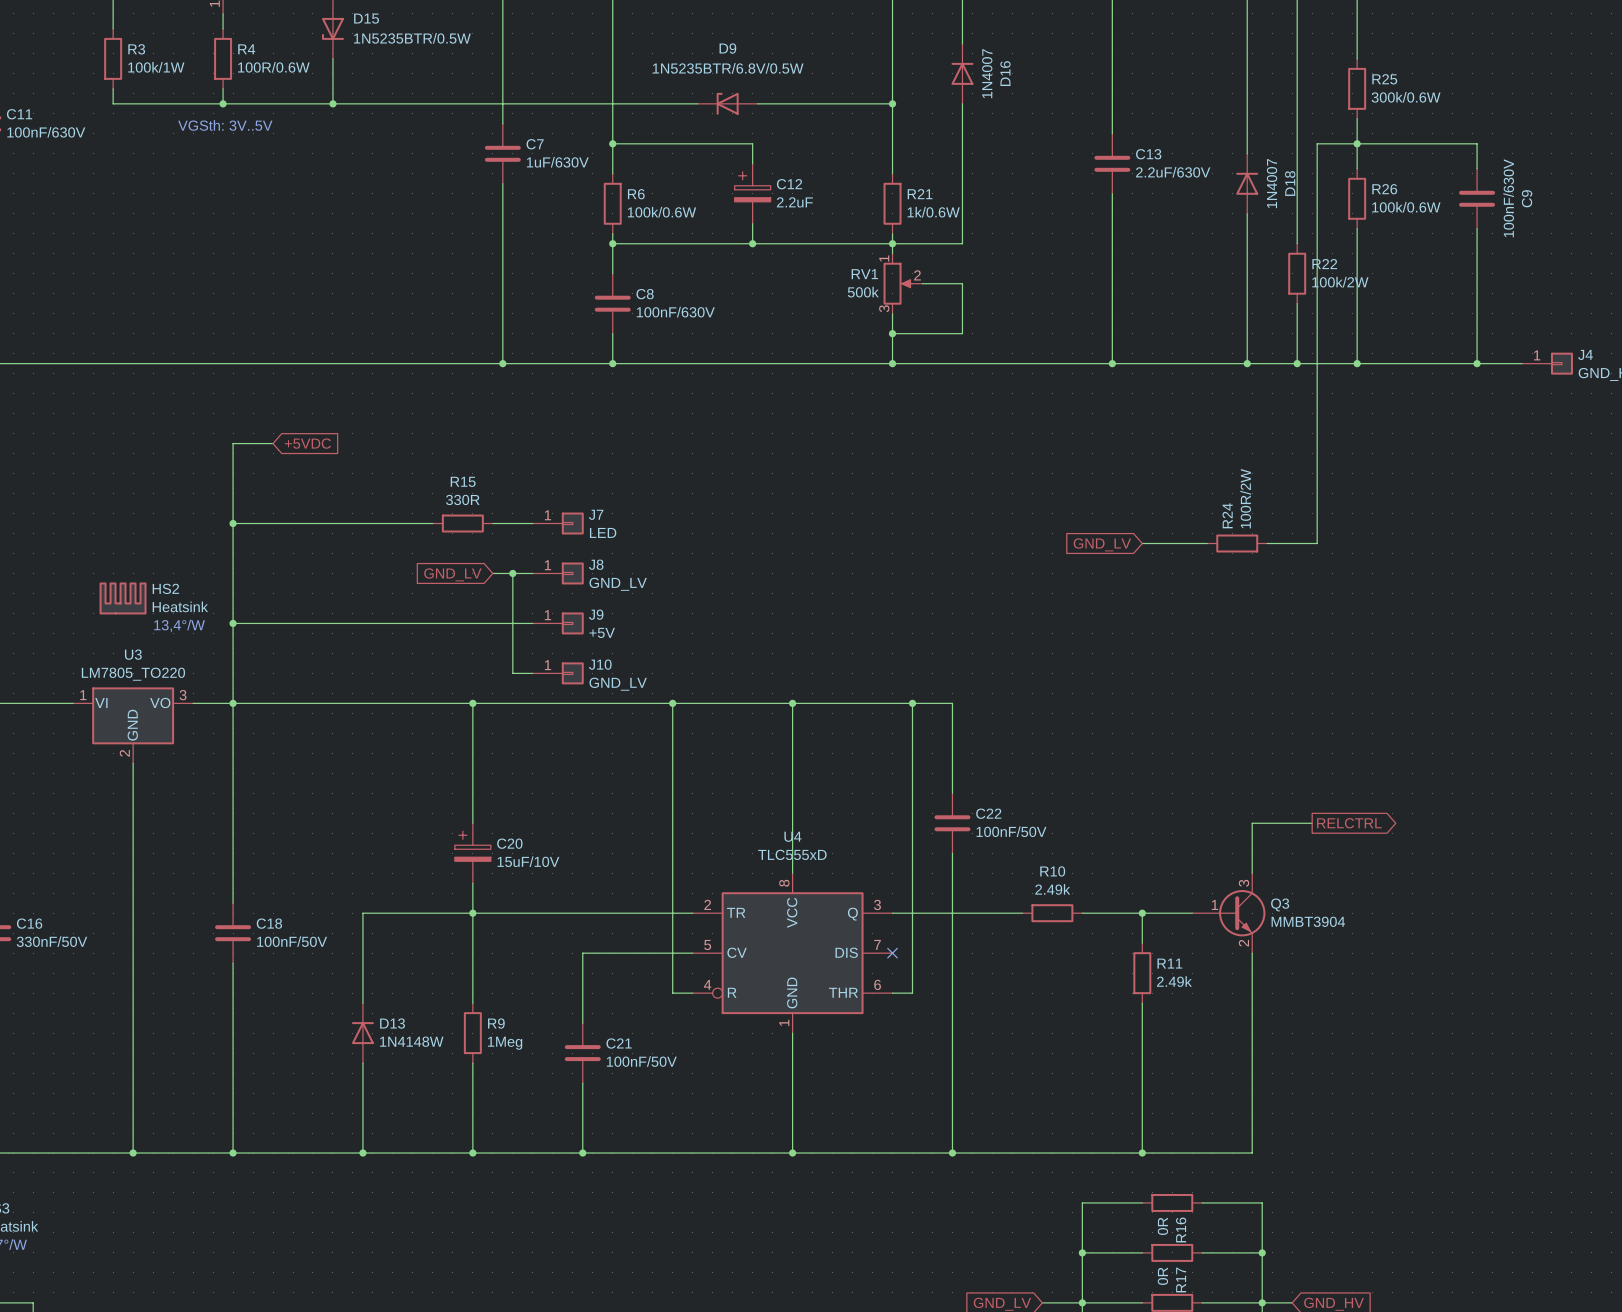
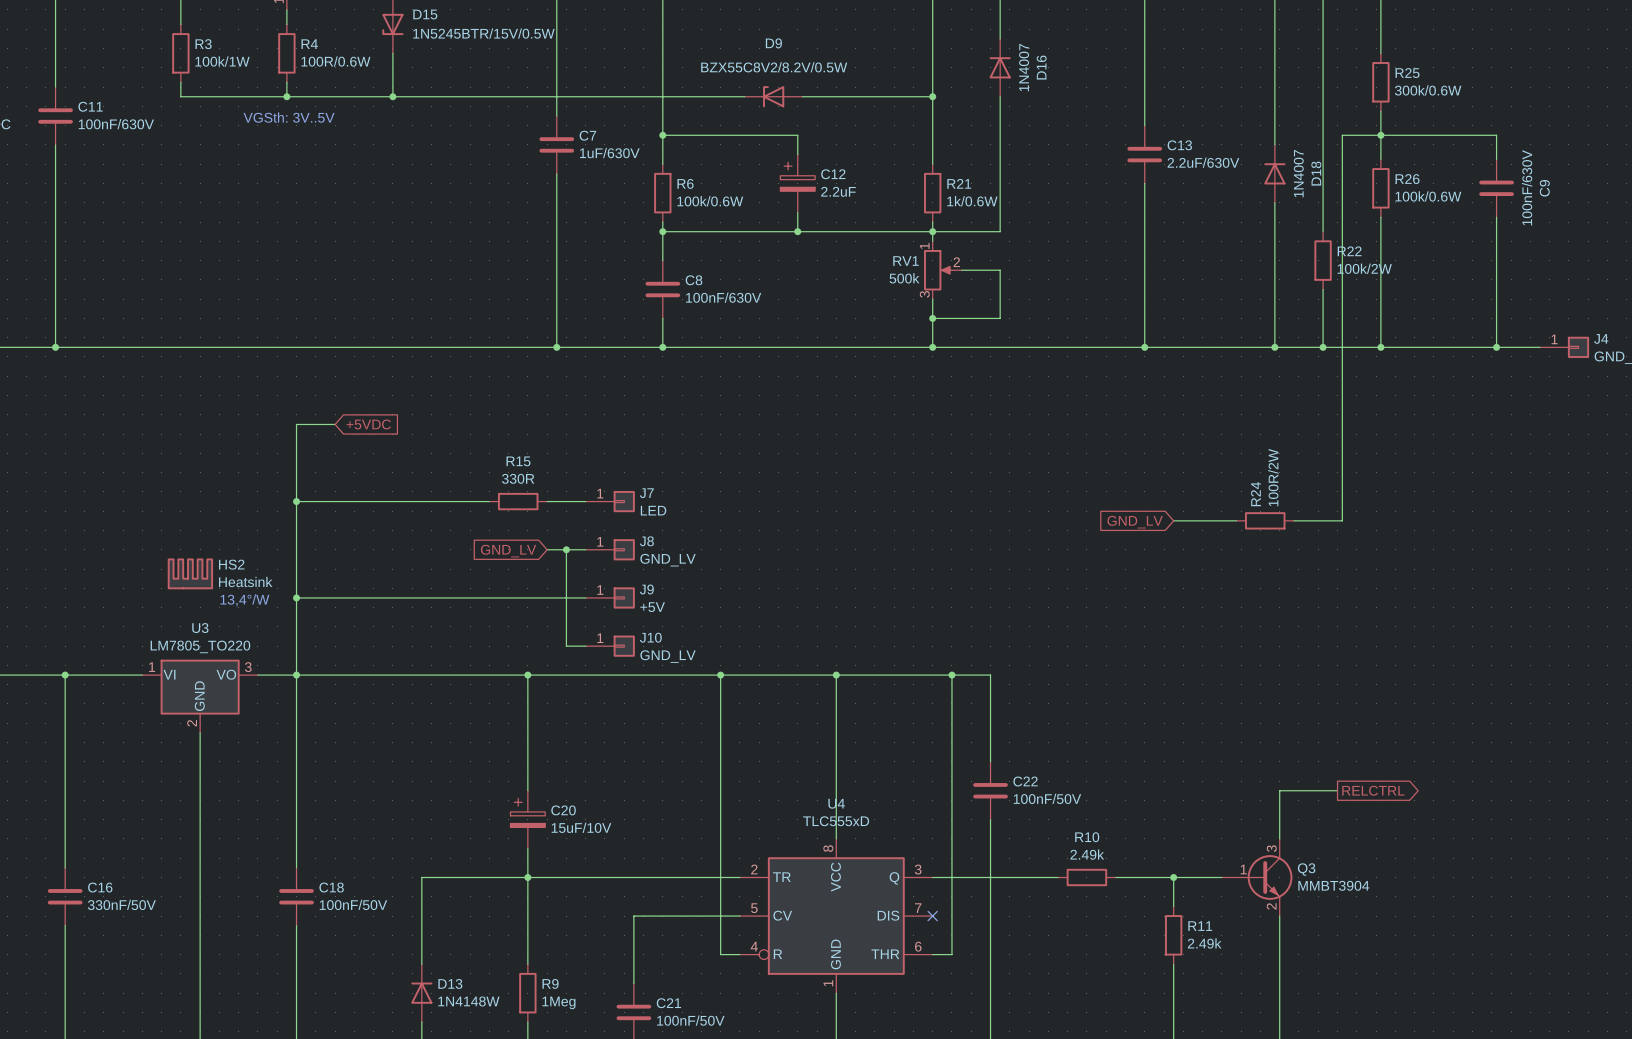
D15 value: 1N5235BTR/0.5W (412, 38) -> 1N5245BTR/15V/0.5W (483, 33)
D9 value: 1N5235BTR/6.8V/0.5W (728, 68) -> BZX55C8V2/8.2V/0.5W (774, 67)

